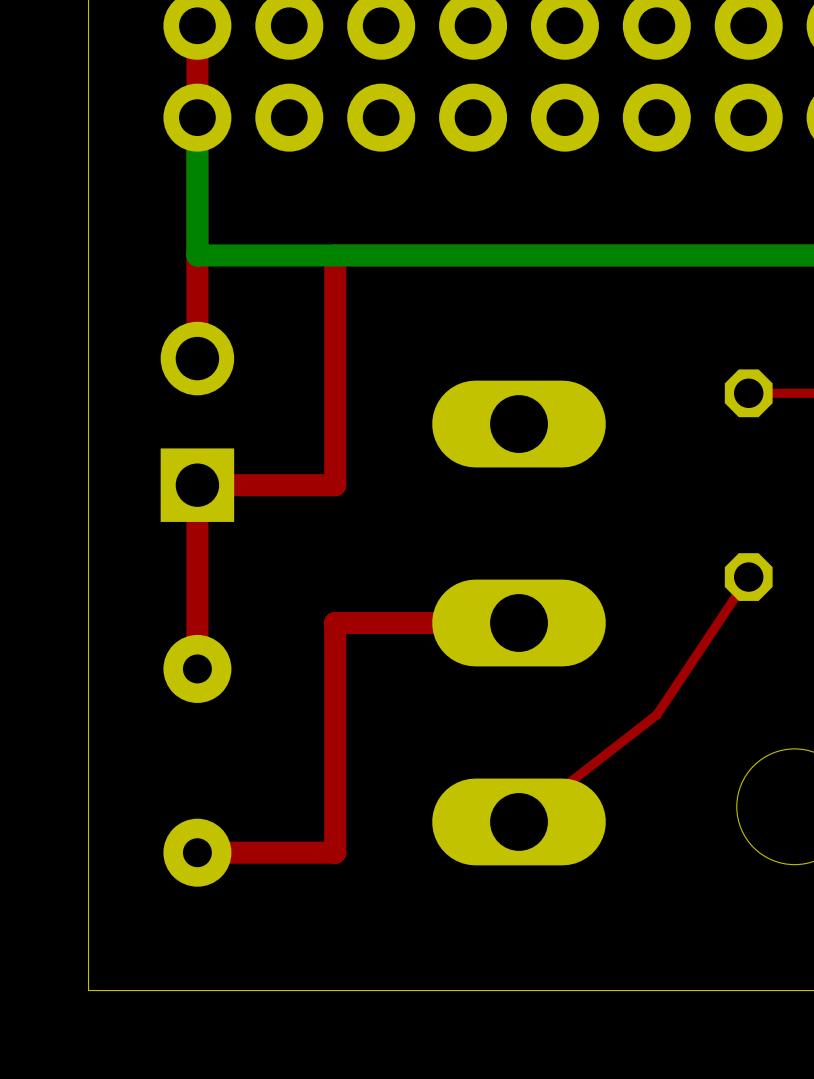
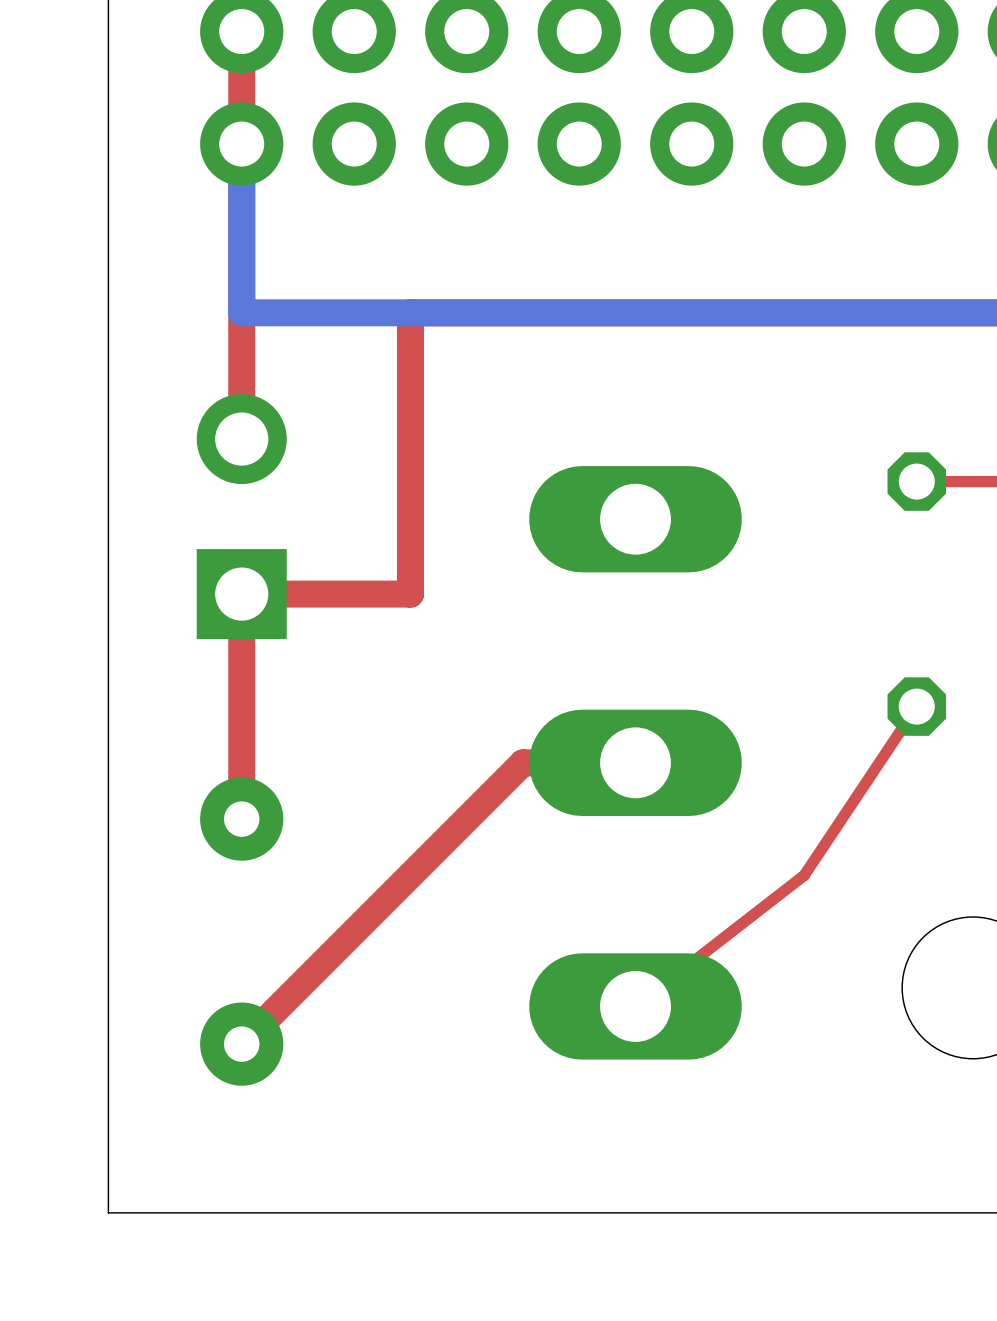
top track: (427, 623) (335, 623) (335, 852) (197, 852) -> (523, 762) (241, 1044)

